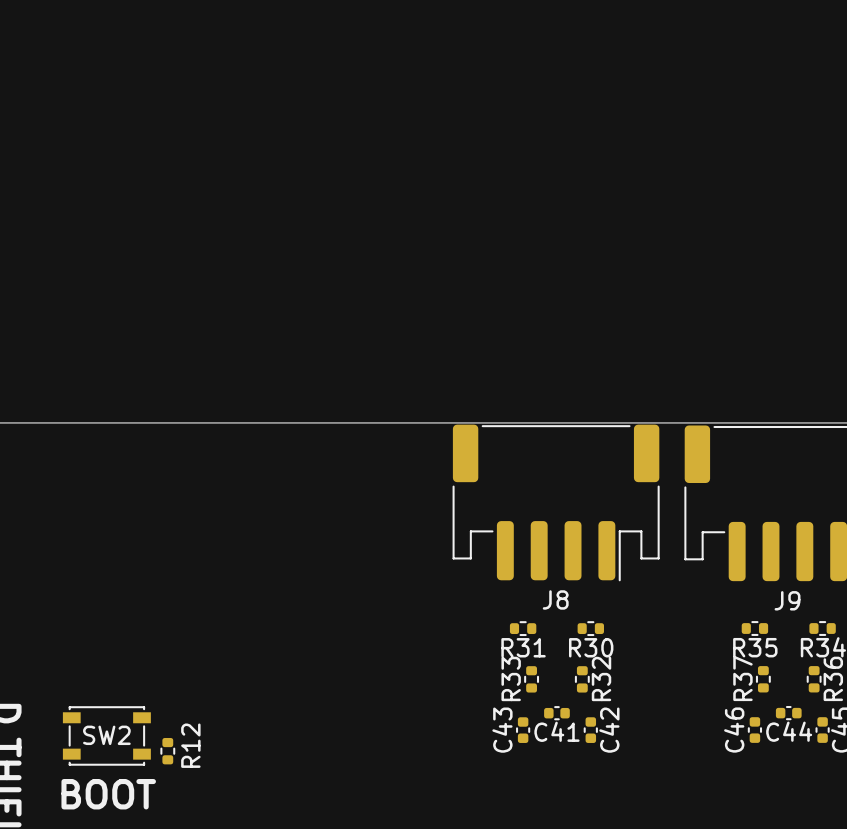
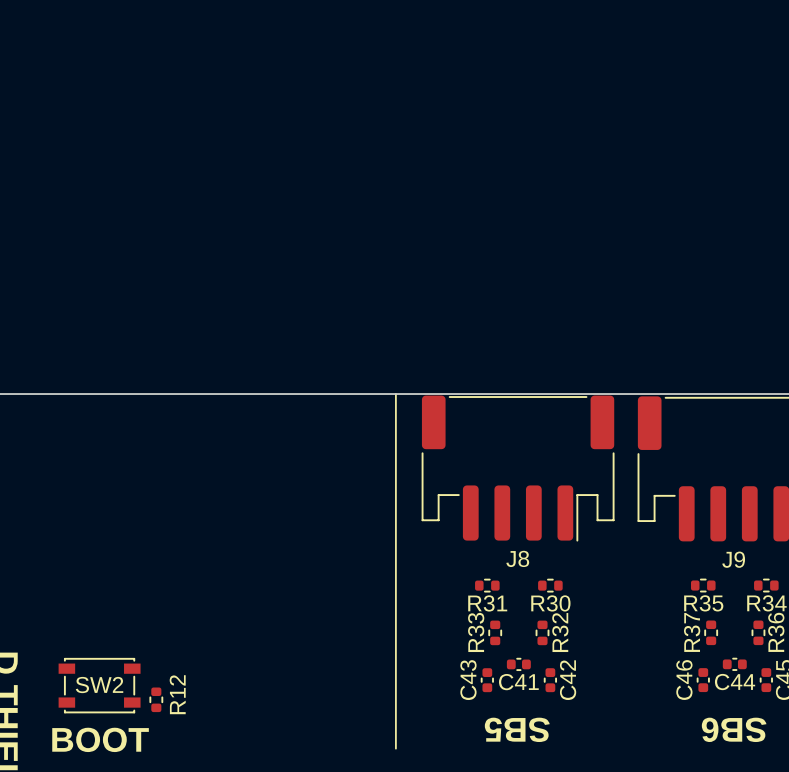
line: none -> (395, 394) (395, 748)
text: none -> SB5 (517, 729)
text: none -> SB6 (734, 729)

